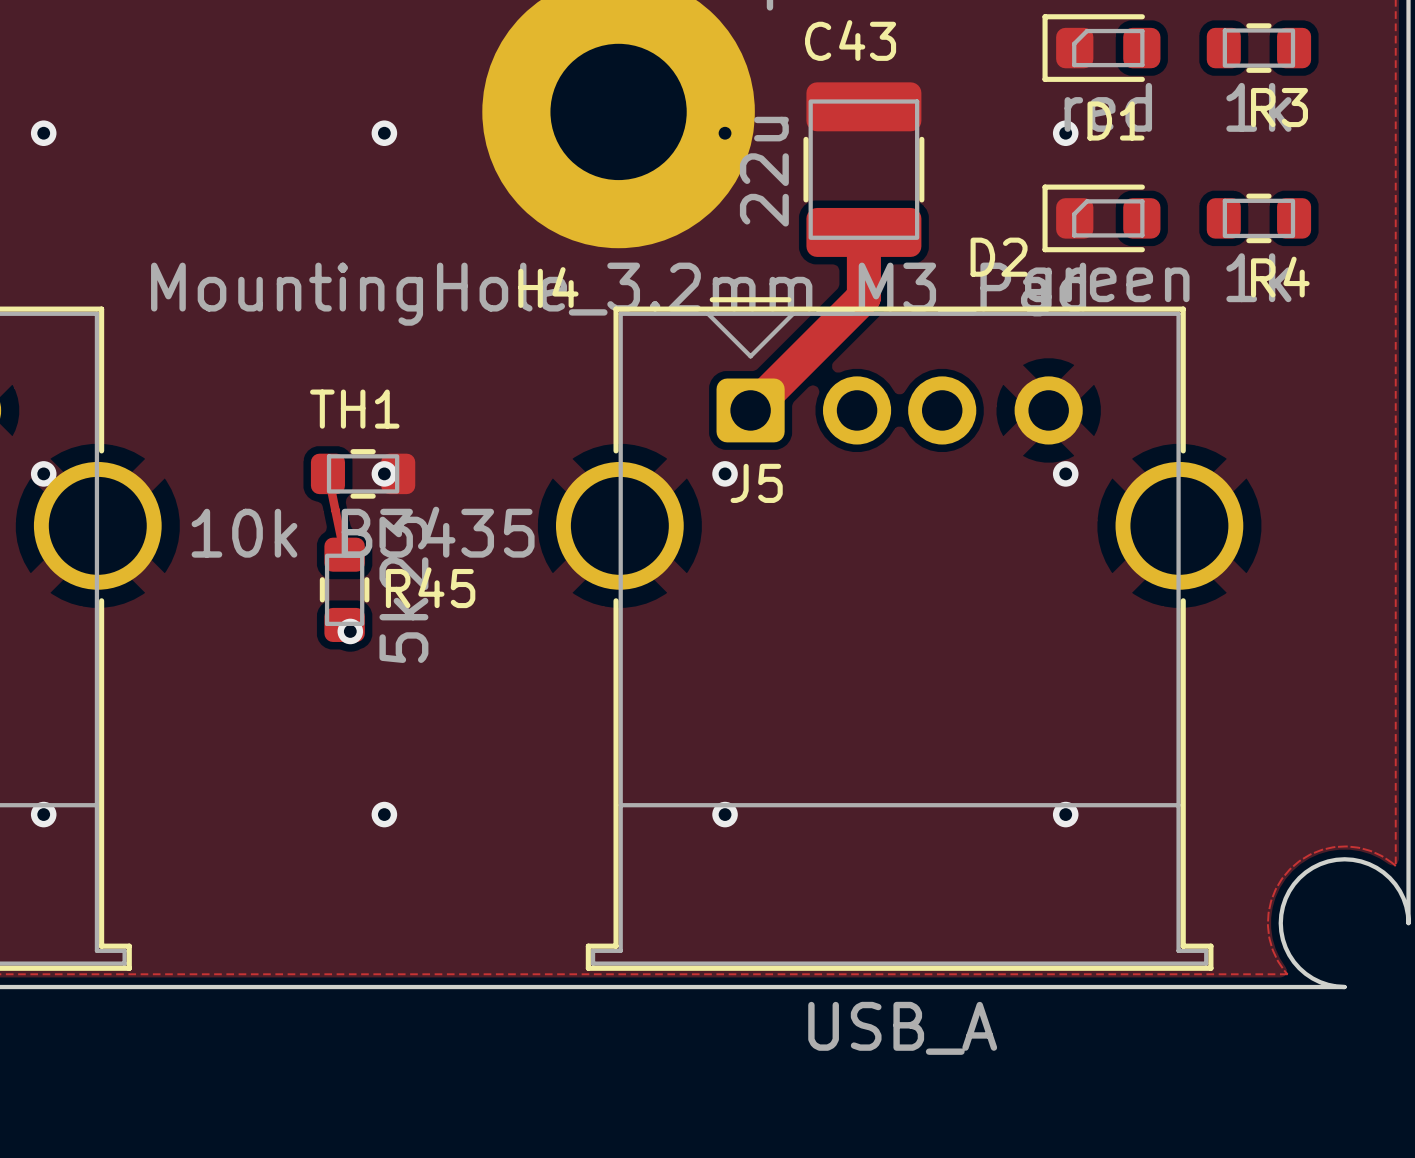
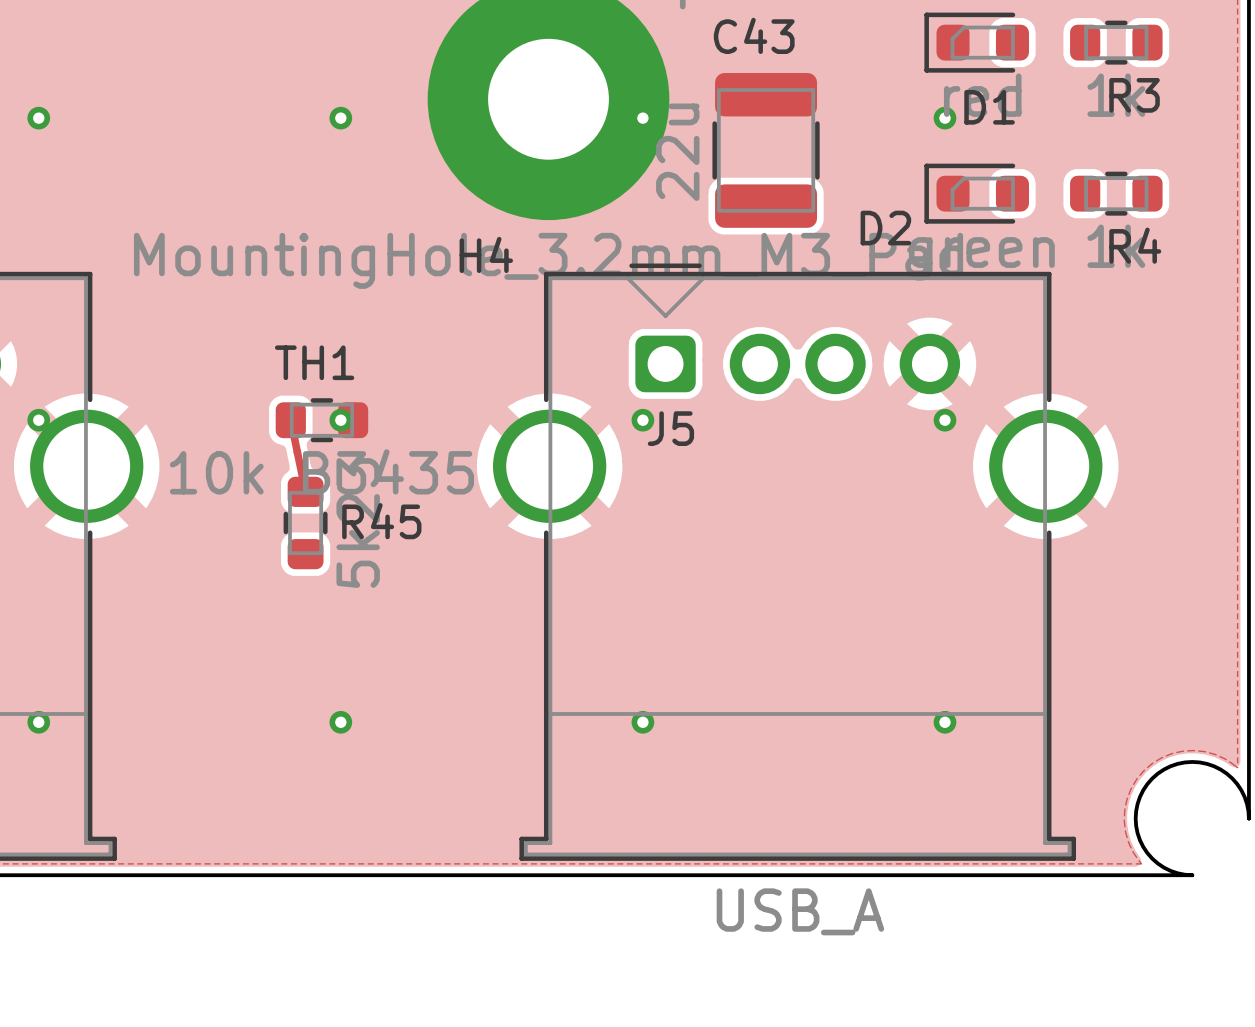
track: (863, 232) (863, 297) (750, 410) -> none
via: (350, 631) -> none

